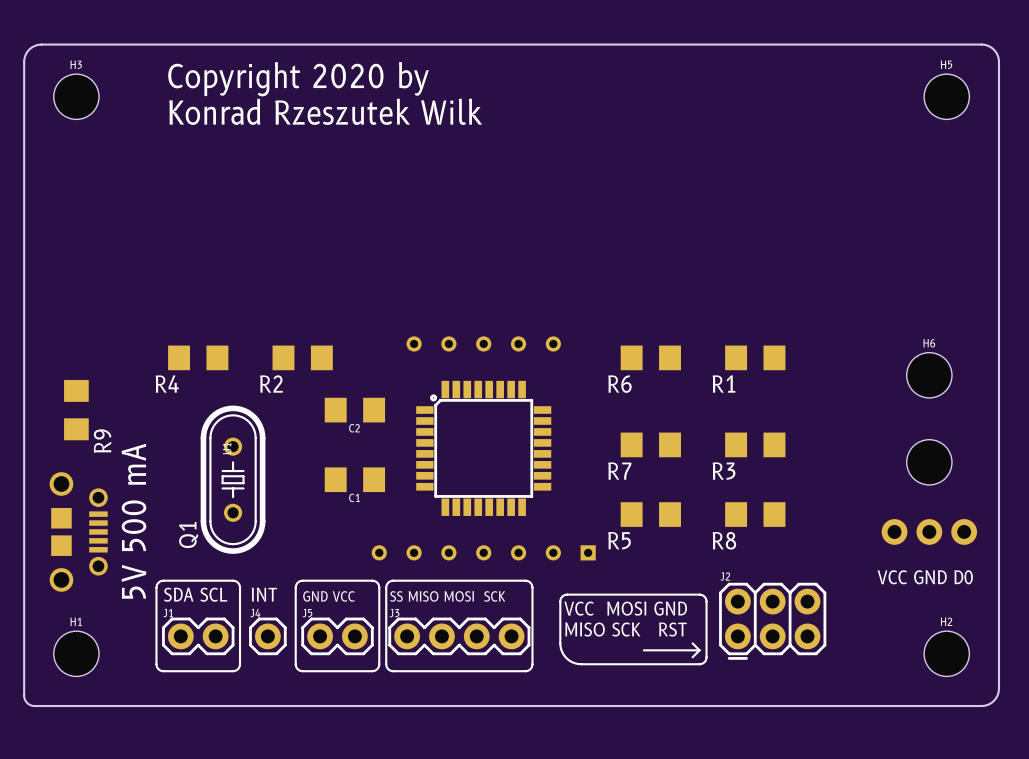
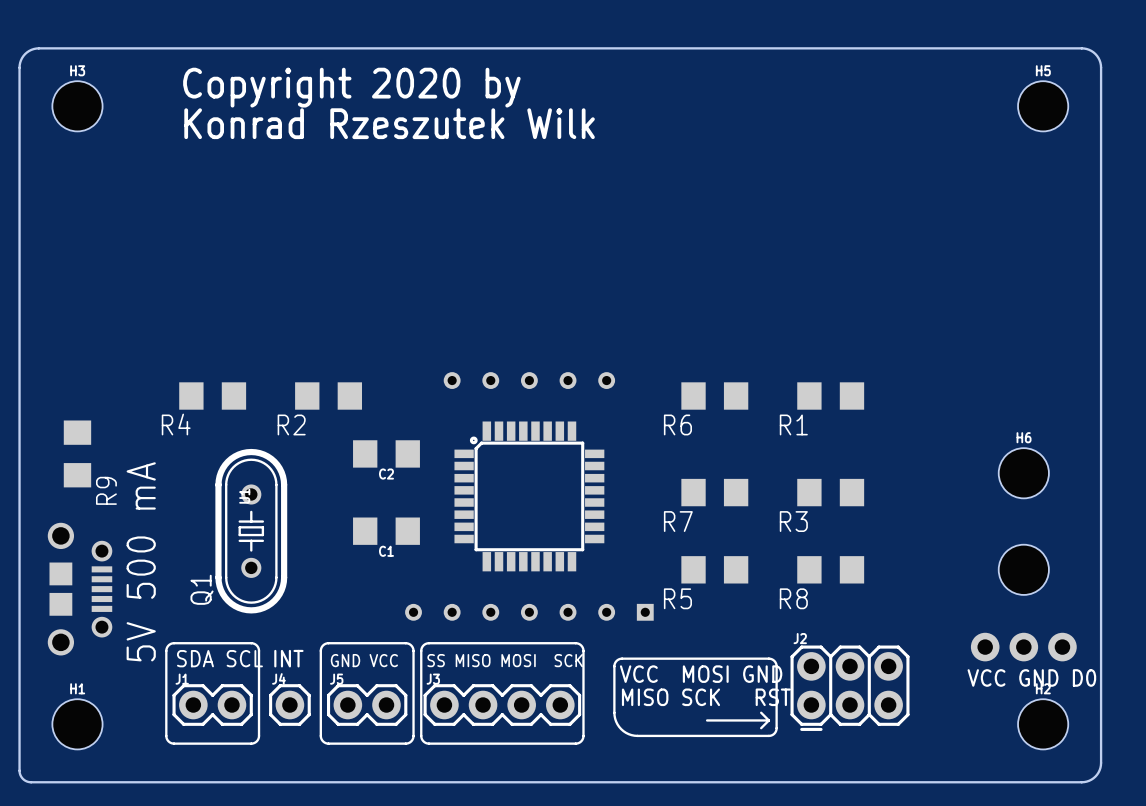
H6 position: (929, 375) -> (1023, 473)
part position: (929, 462) -> (1023, 569)
part position: (929, 531) -> (1023, 647)
text position: VCC GND D0 (925, 577) -> VCC GND D0 (1031, 677)

